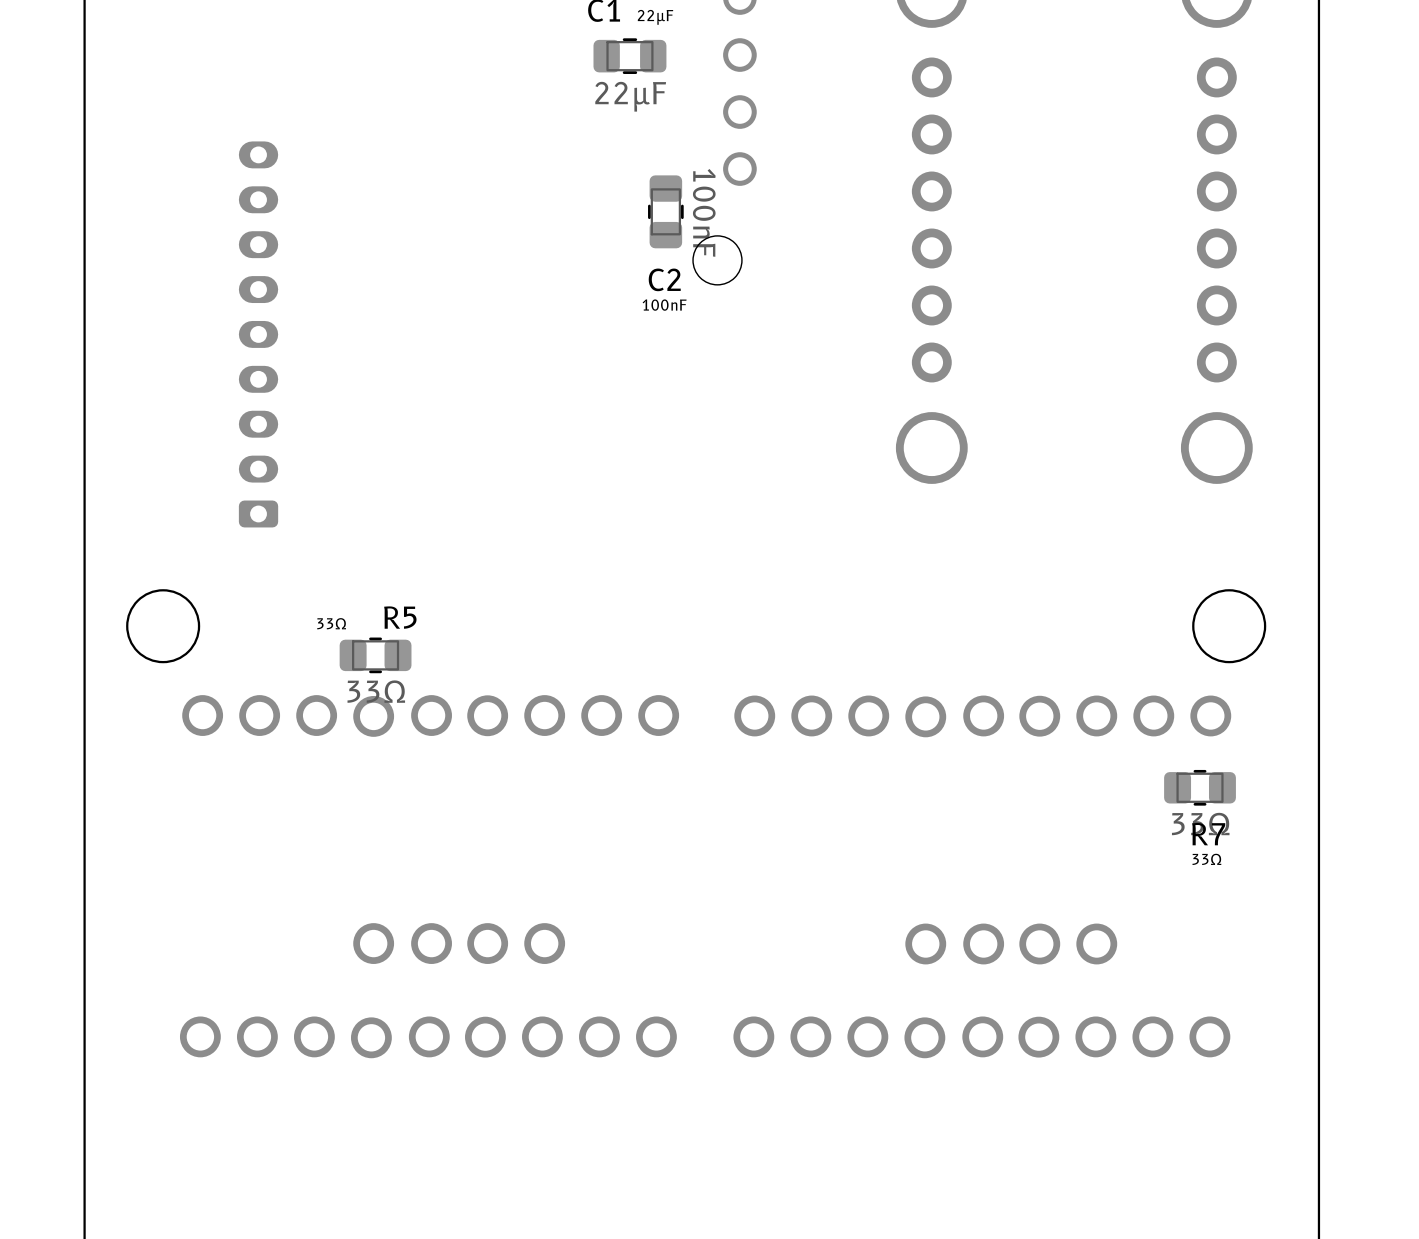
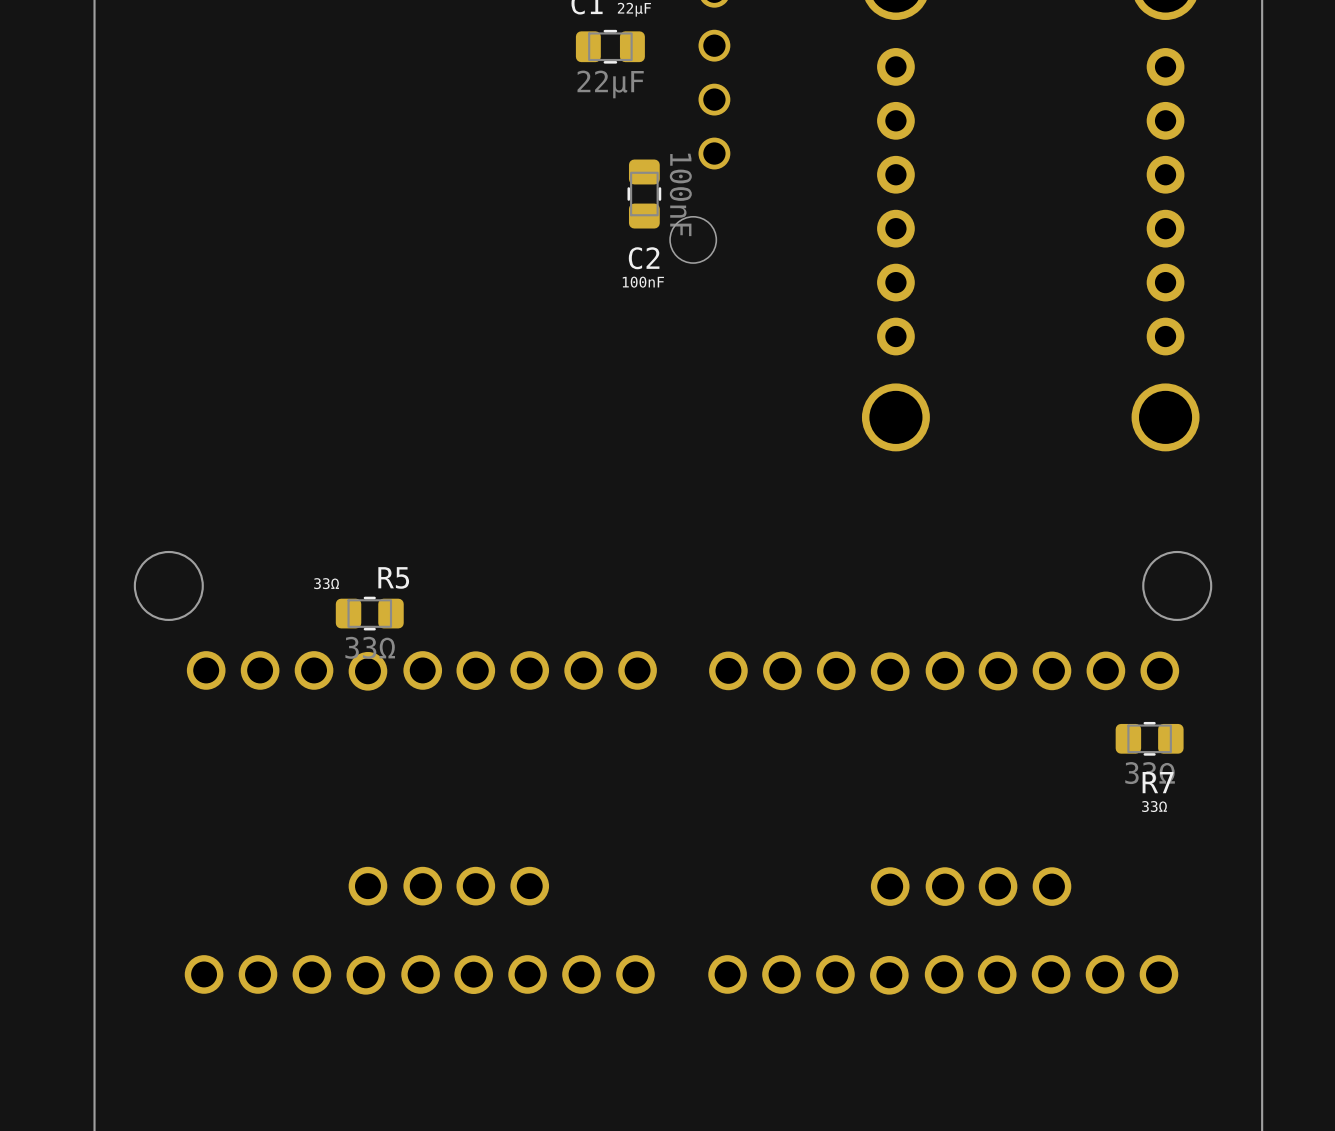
part: (258, 334) -> none

